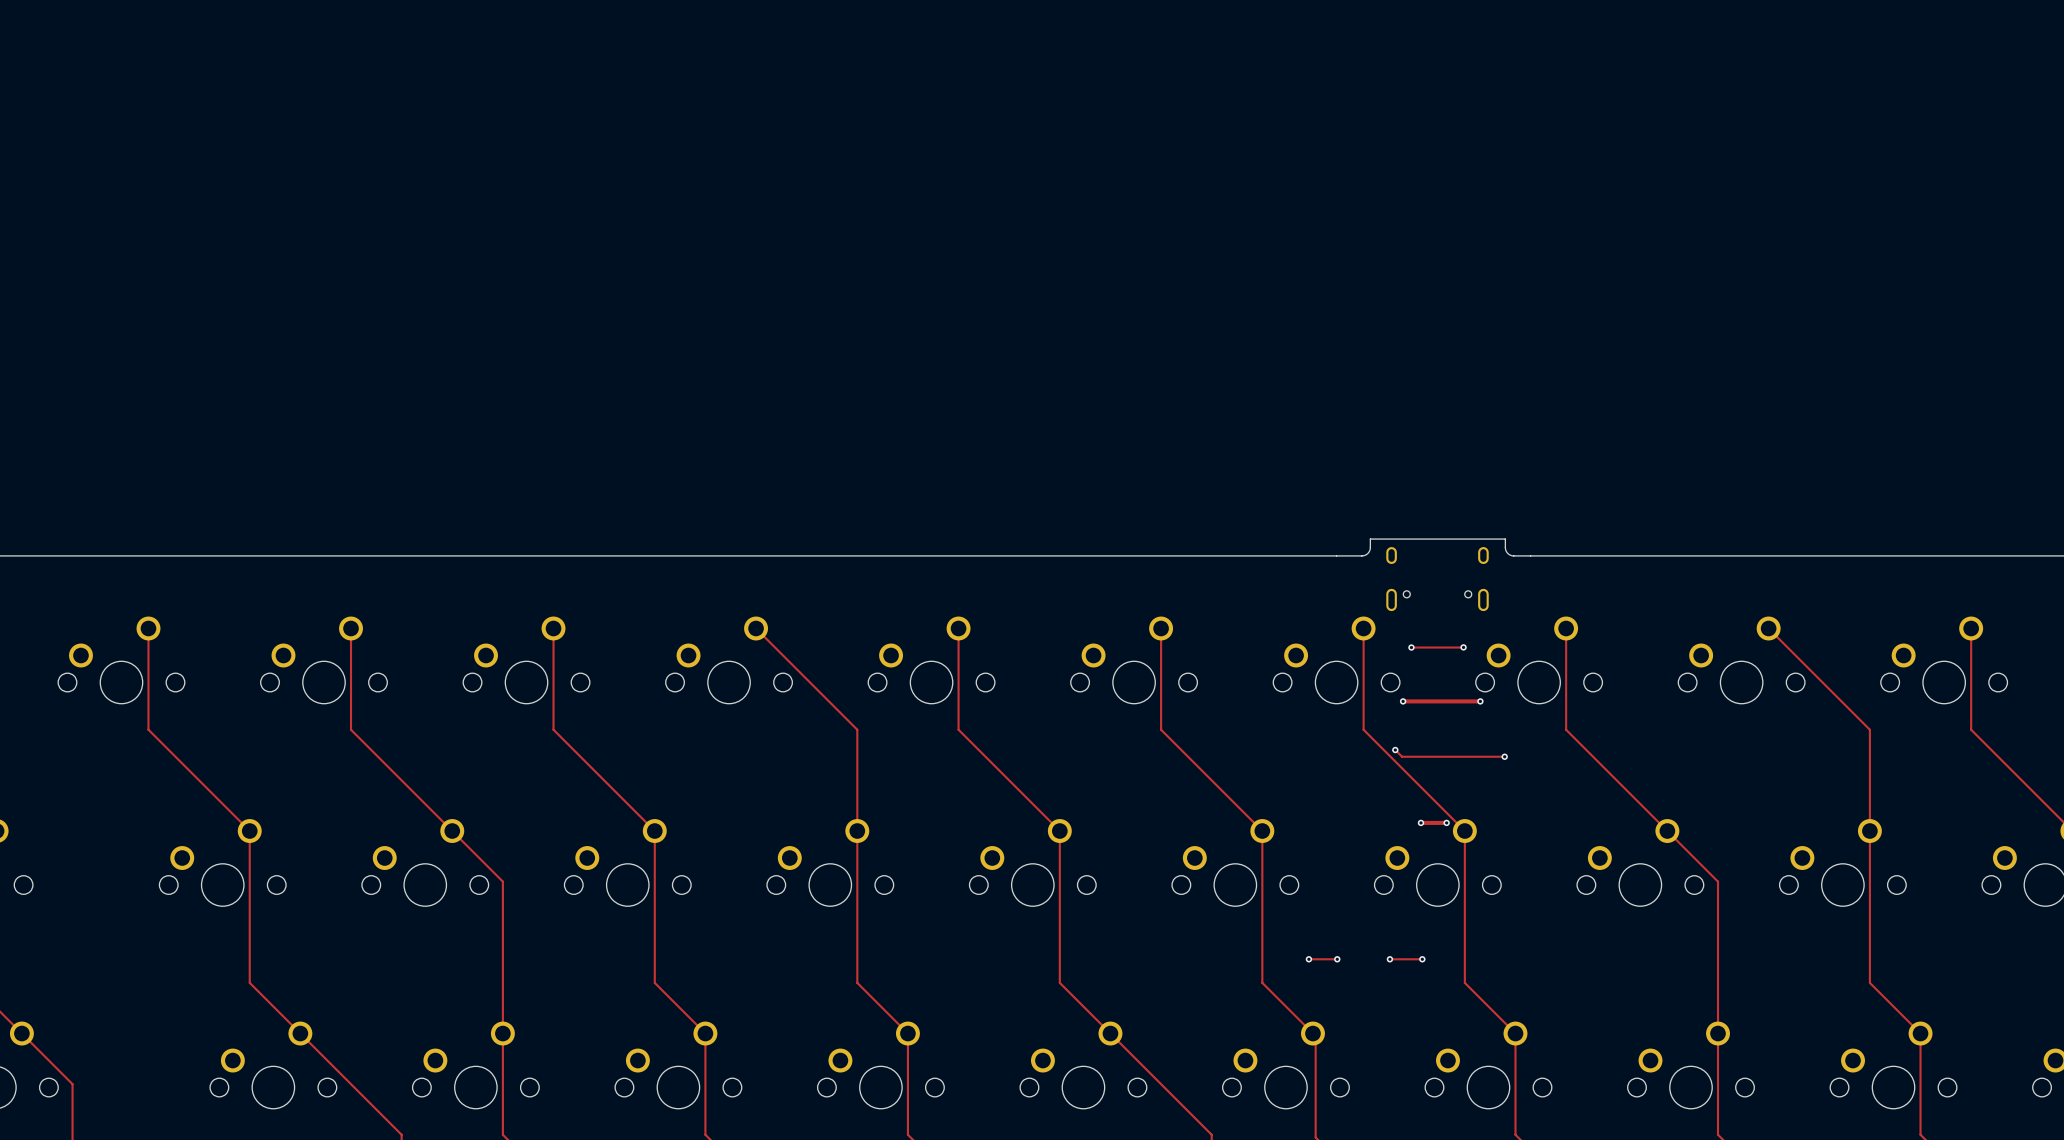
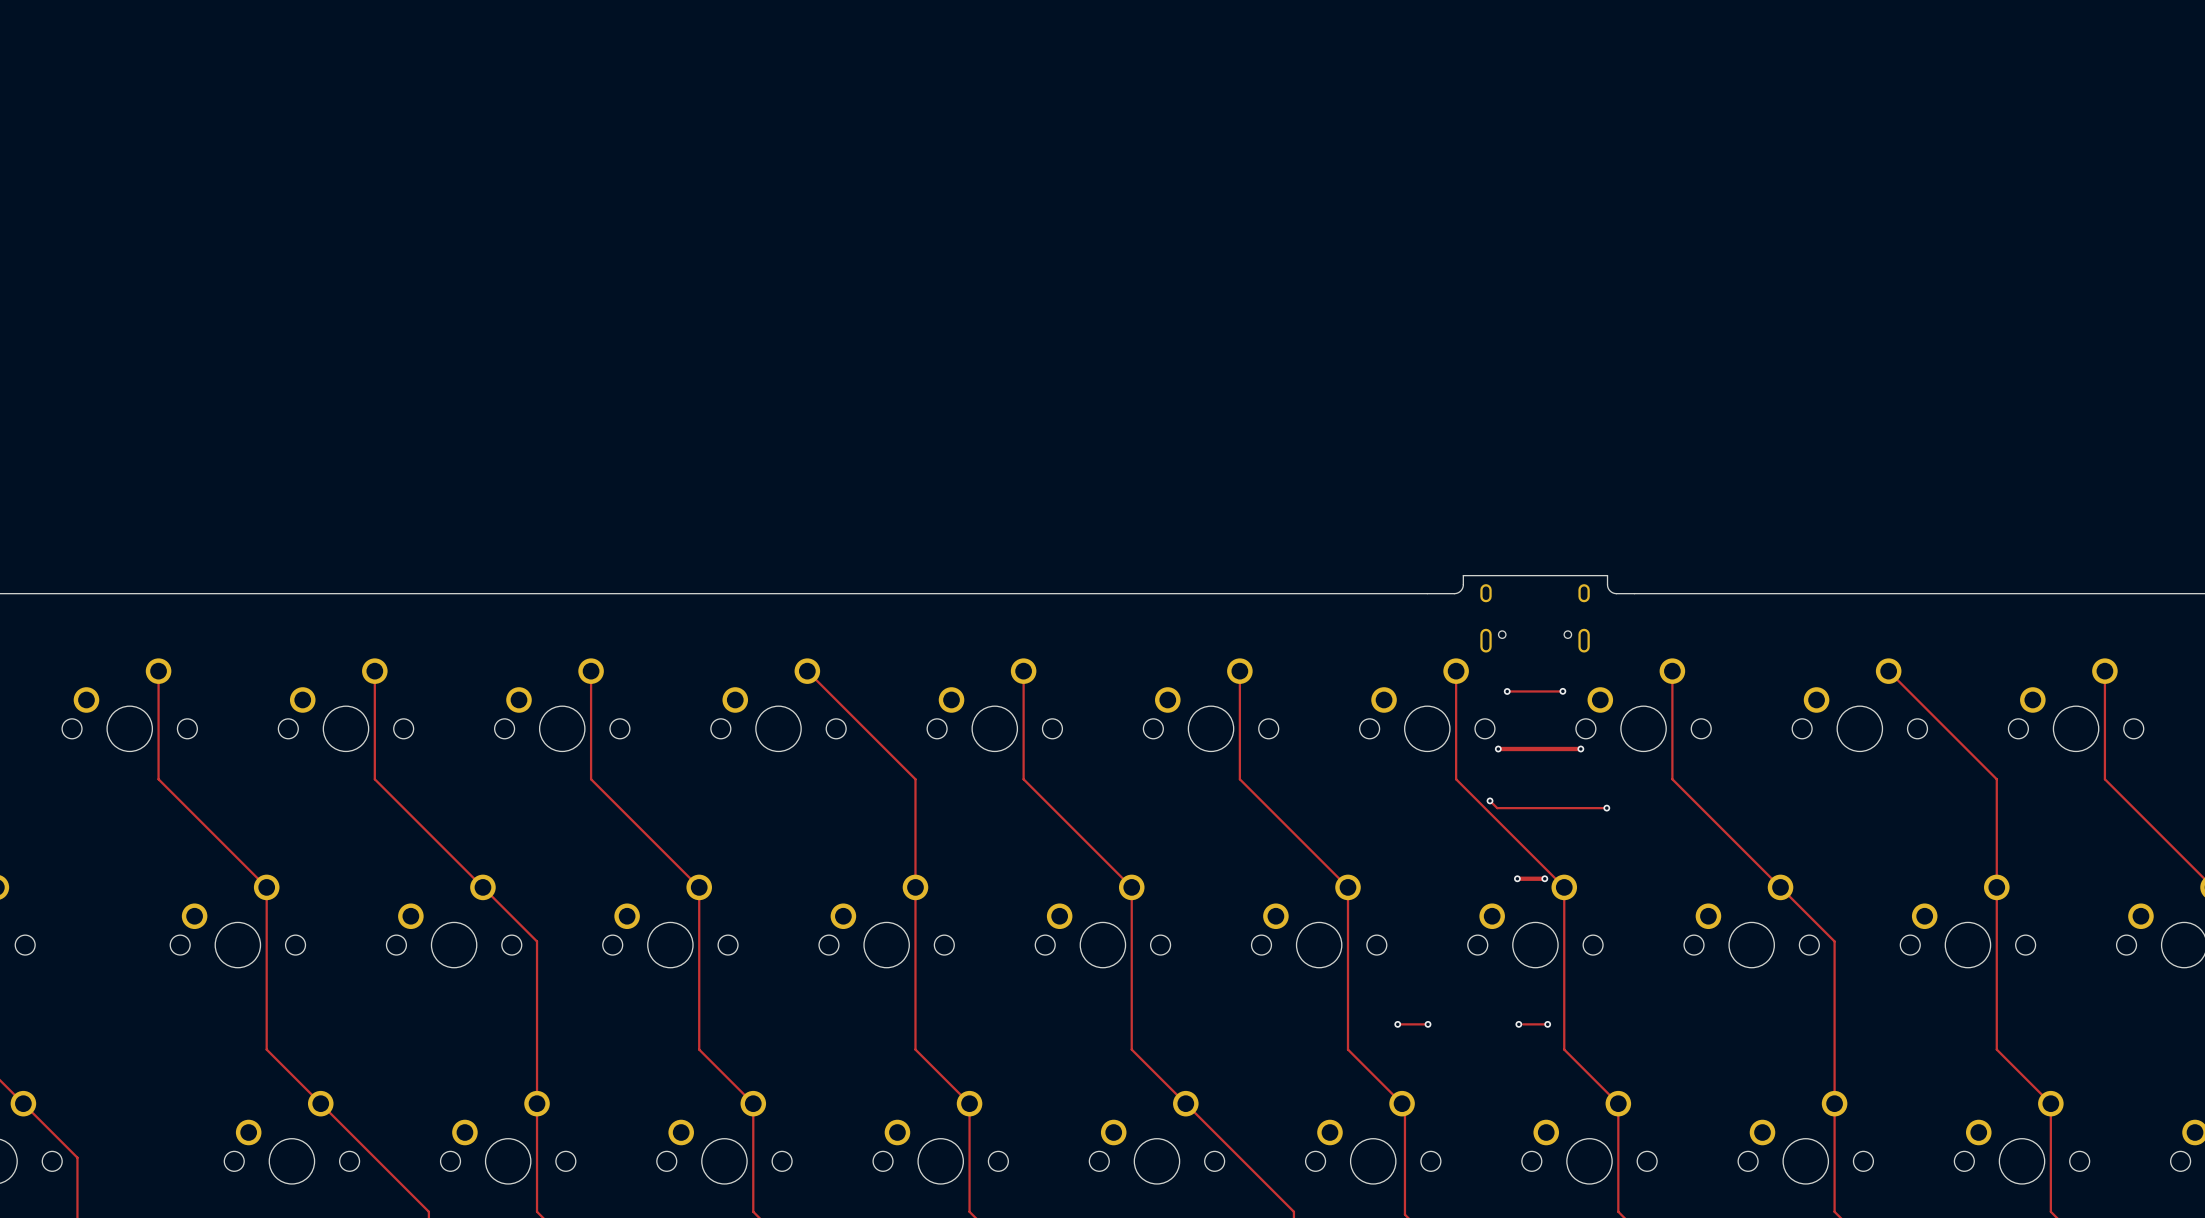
track: (1389, 959) (1422, 959) -> none
via position: (1389, 959) -> (1547, 1024)
track: none -> (1523, 1024) (1547, 1024)

